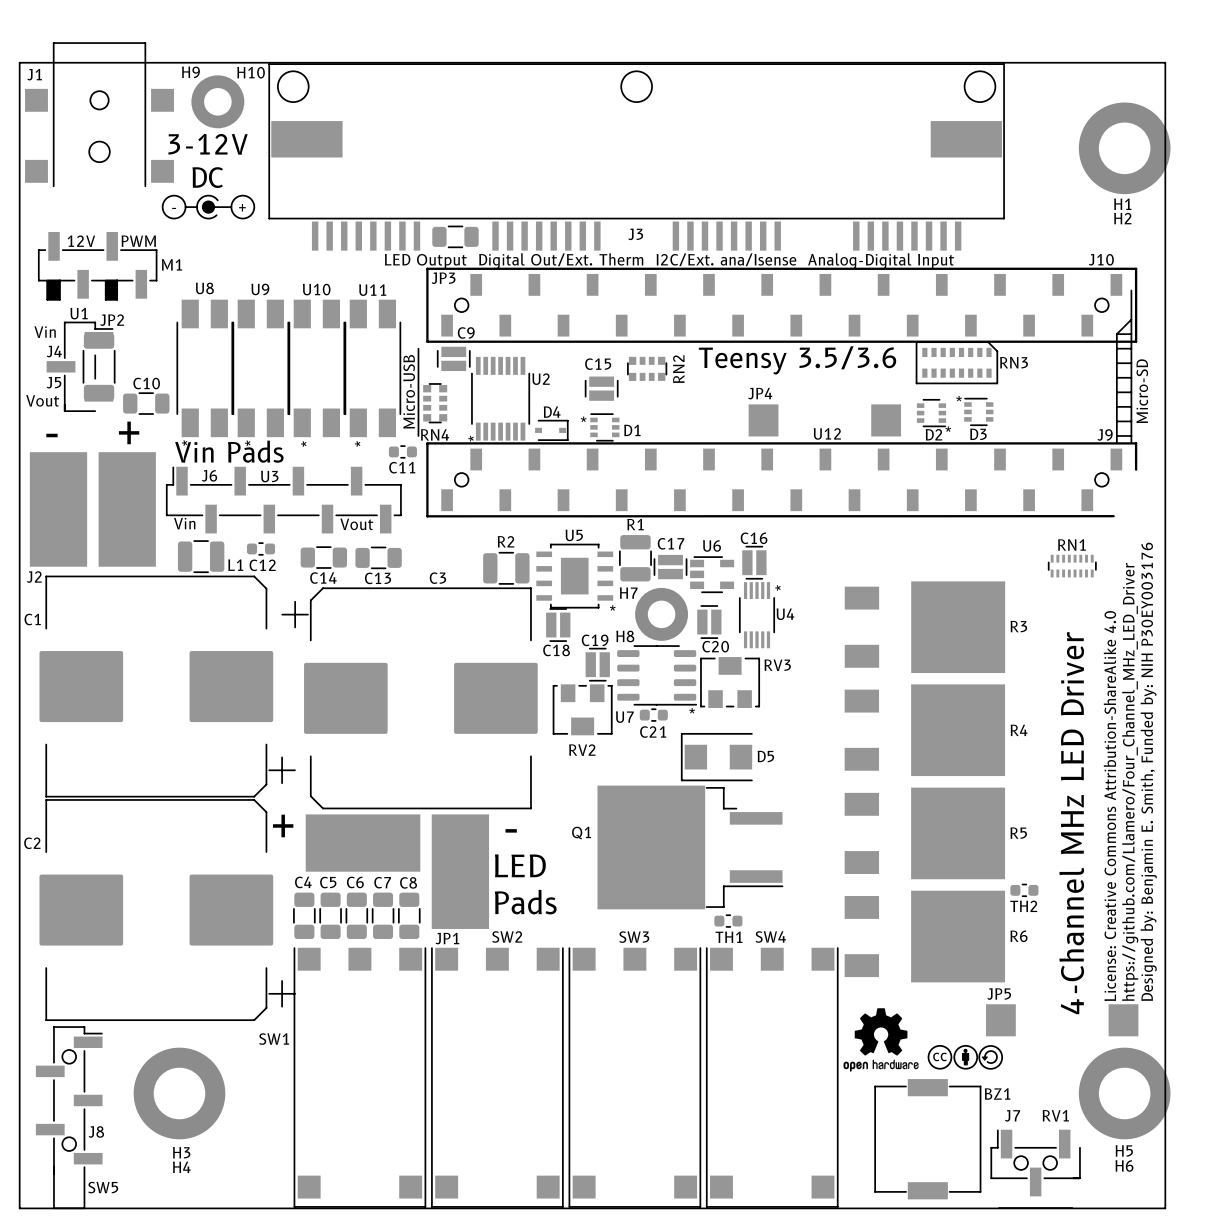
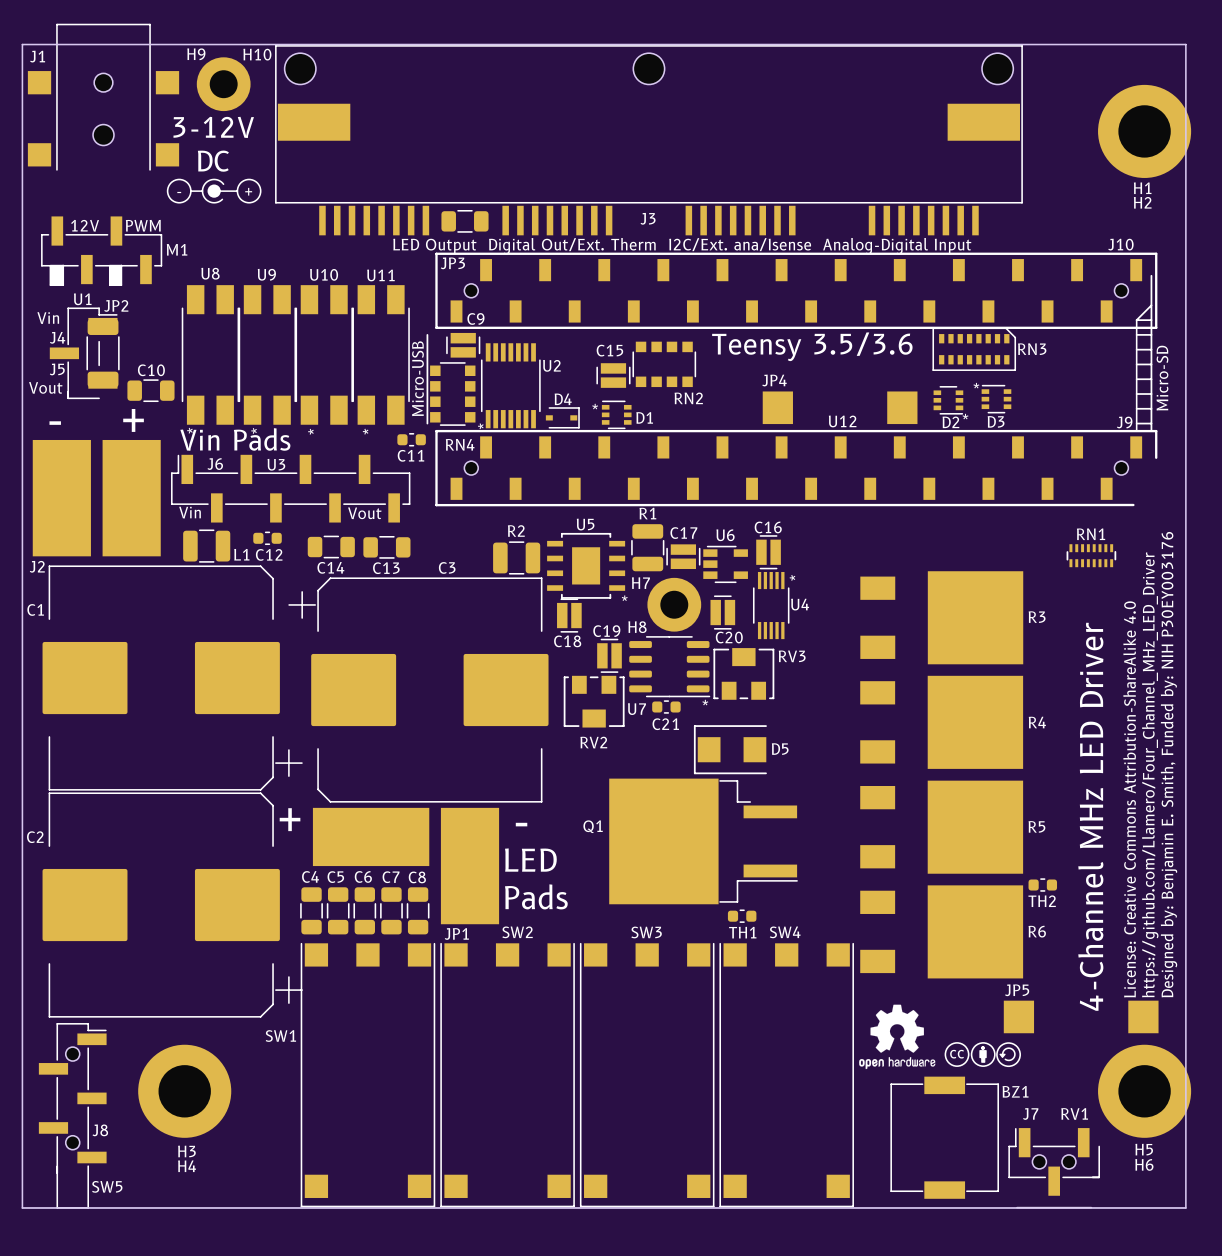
RN2 footprint: [627, 356, 668, 381] -> [632, 341, 697, 388]
RN2 name position: RN2 (678, 369) -> RN2 (688, 398)
RN4 footprint: [423, 383, 448, 424] -> [430, 362, 476, 426]

